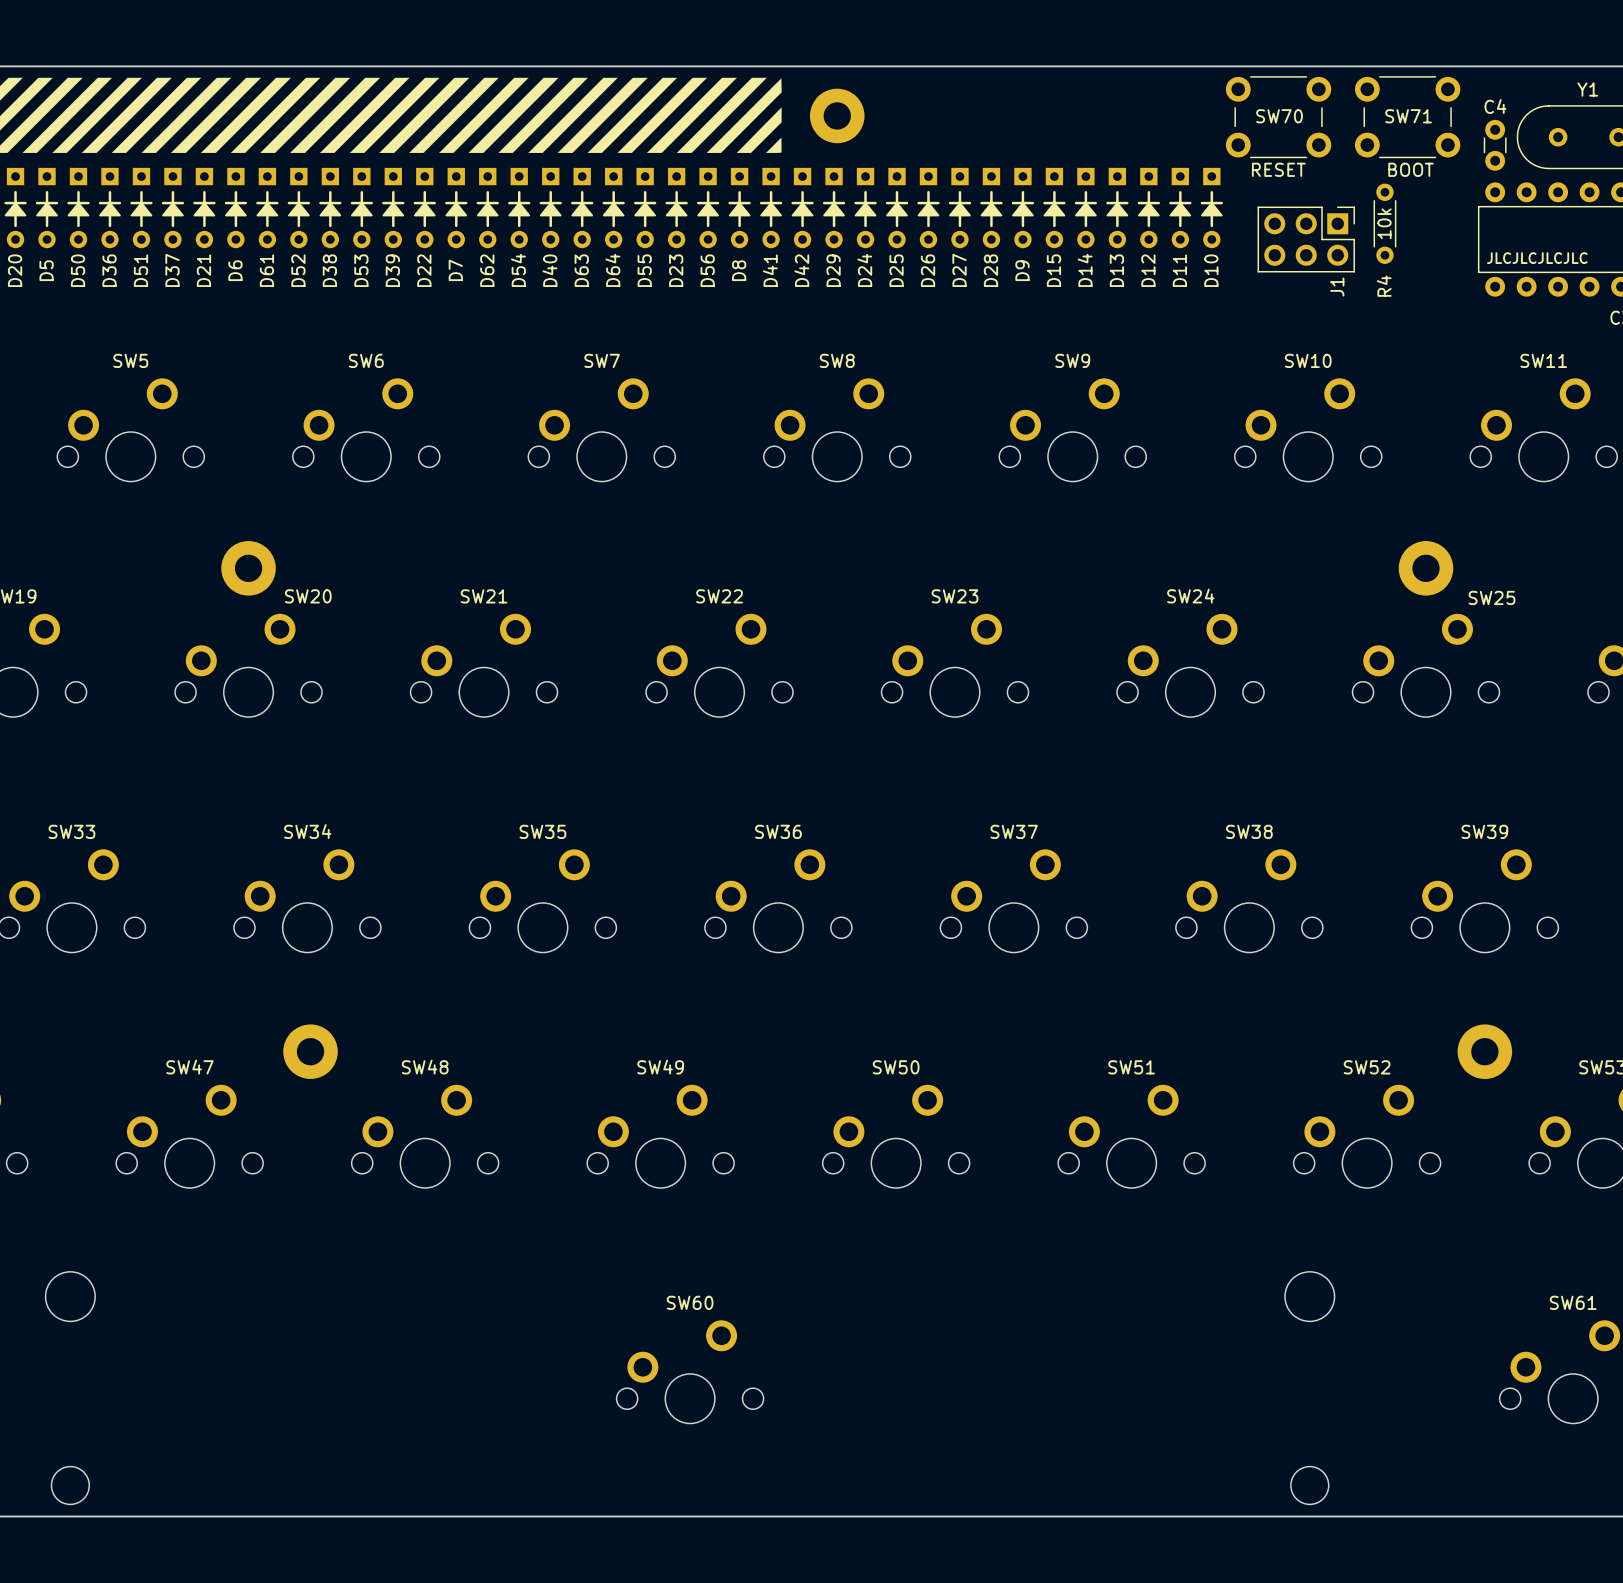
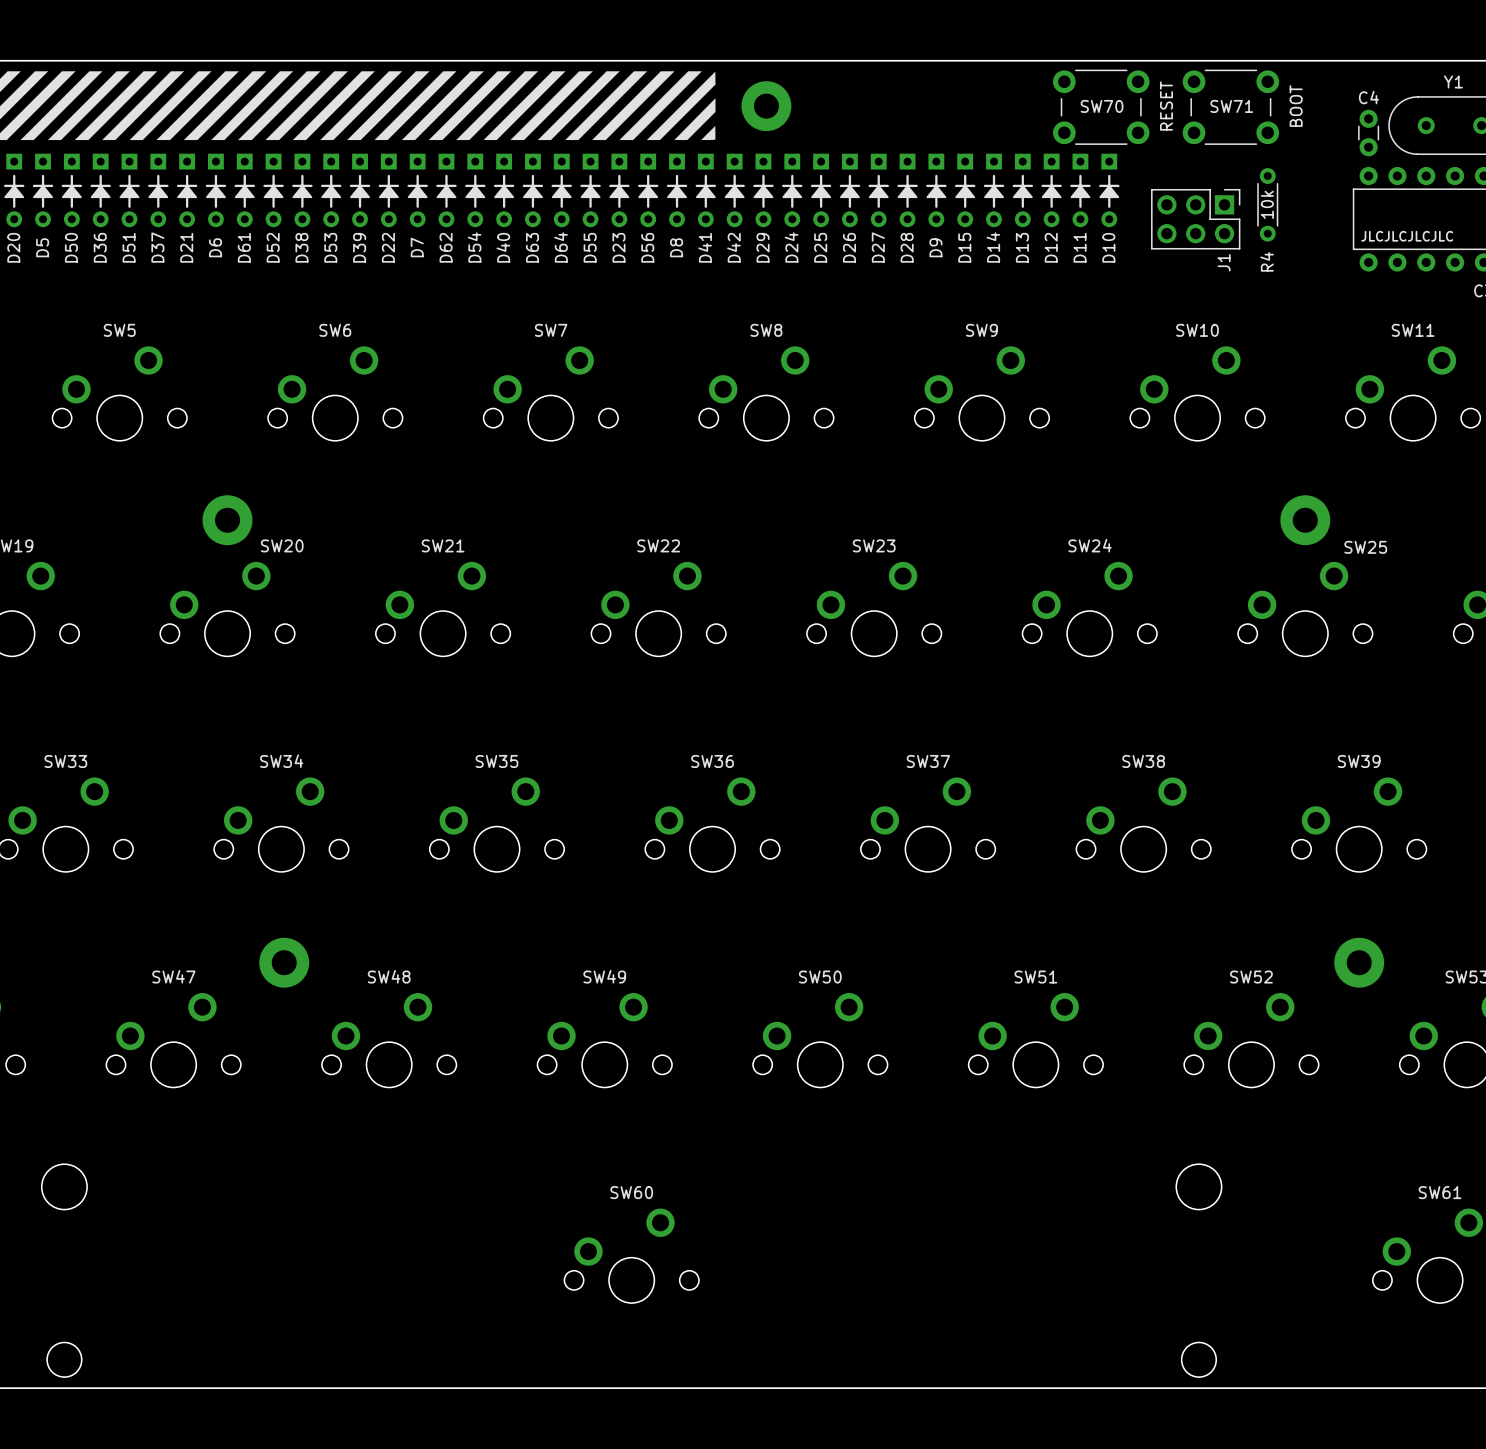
SW70 position: (1278, 117) -> (1101, 107)
SW71 position: (1407, 117) -> (1230, 107)
text rotation: 0° (1278, 169) -> 90° counterclockwise (1166, 106)
text rotation: 0° (1411, 169) -> 90° counterclockwise (1296, 106)

